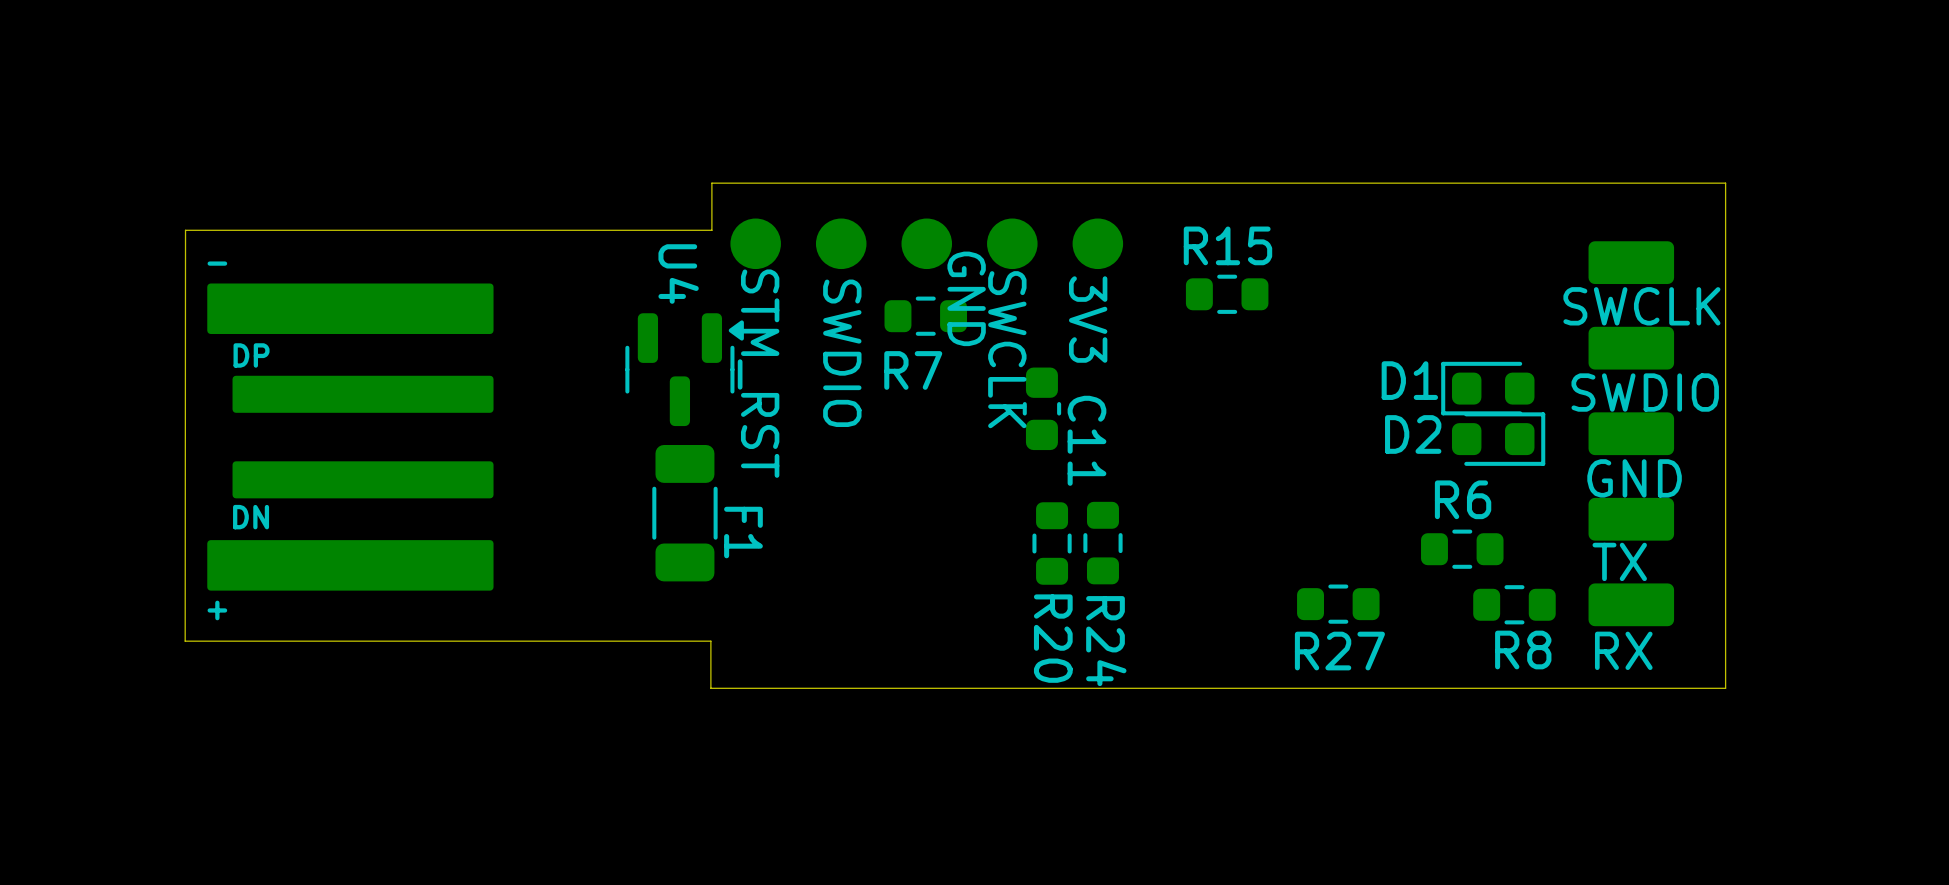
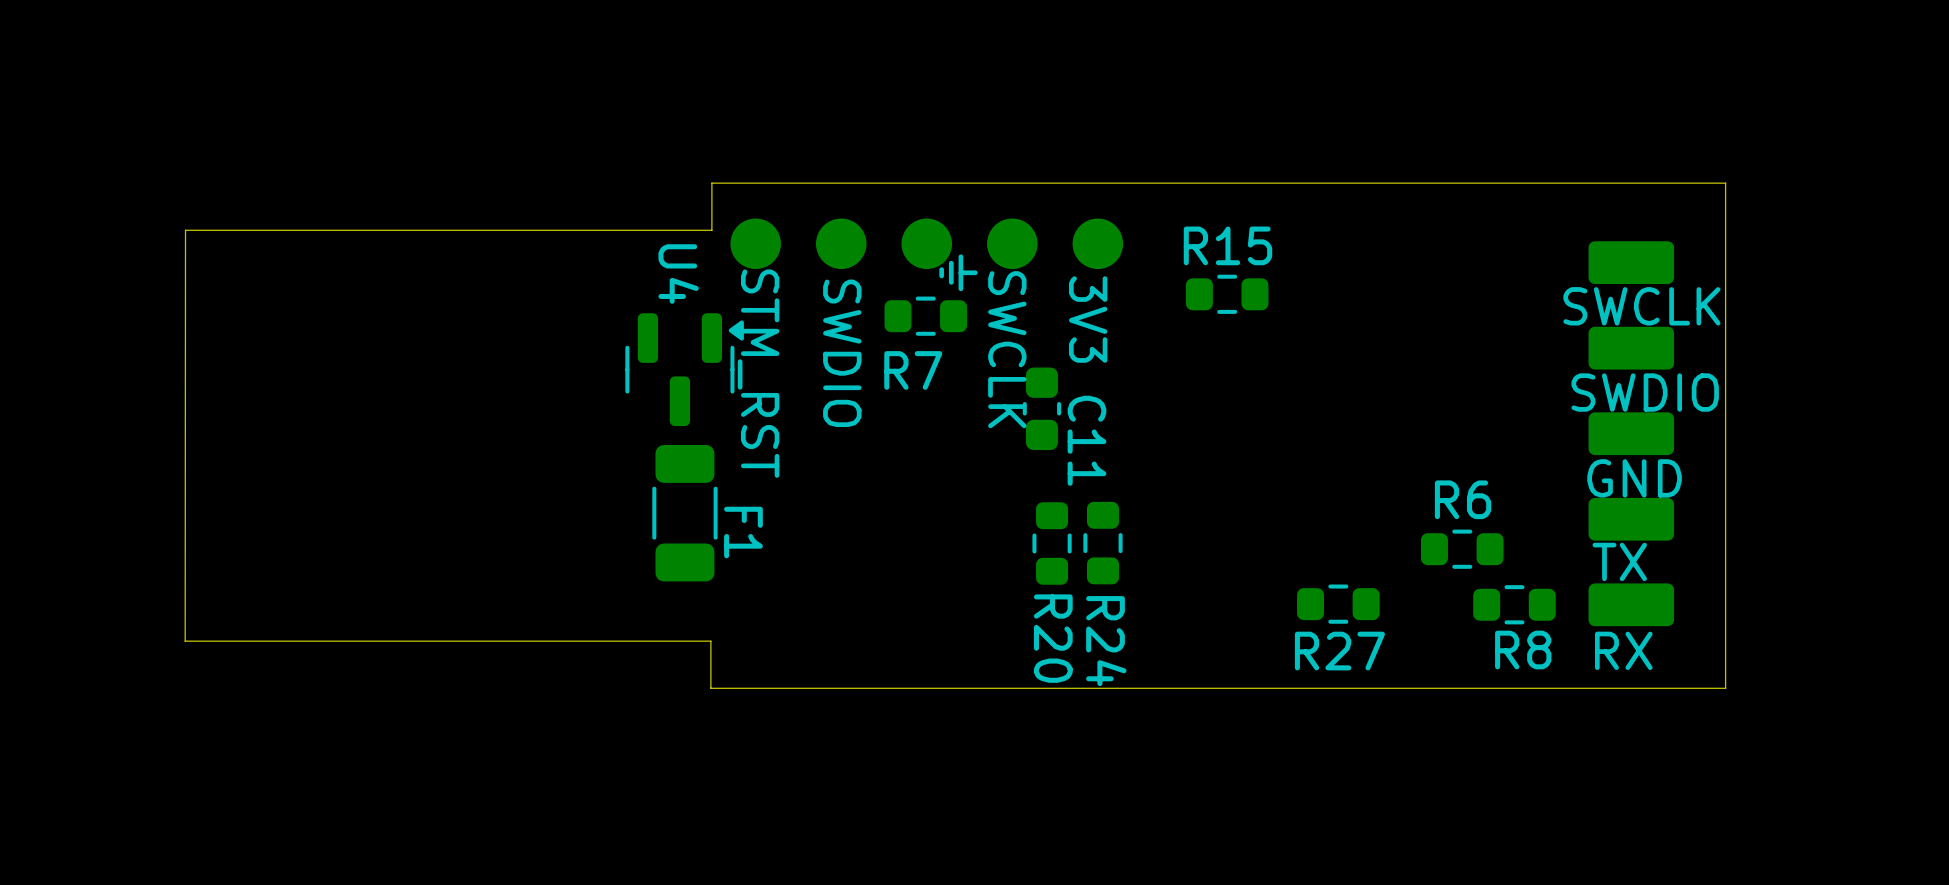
text: GND (966, 298) -> ⏚ (958, 272)
D1: (1487, 388) -> none
part: (350, 437) -> none
D2: (1498, 439) -> none

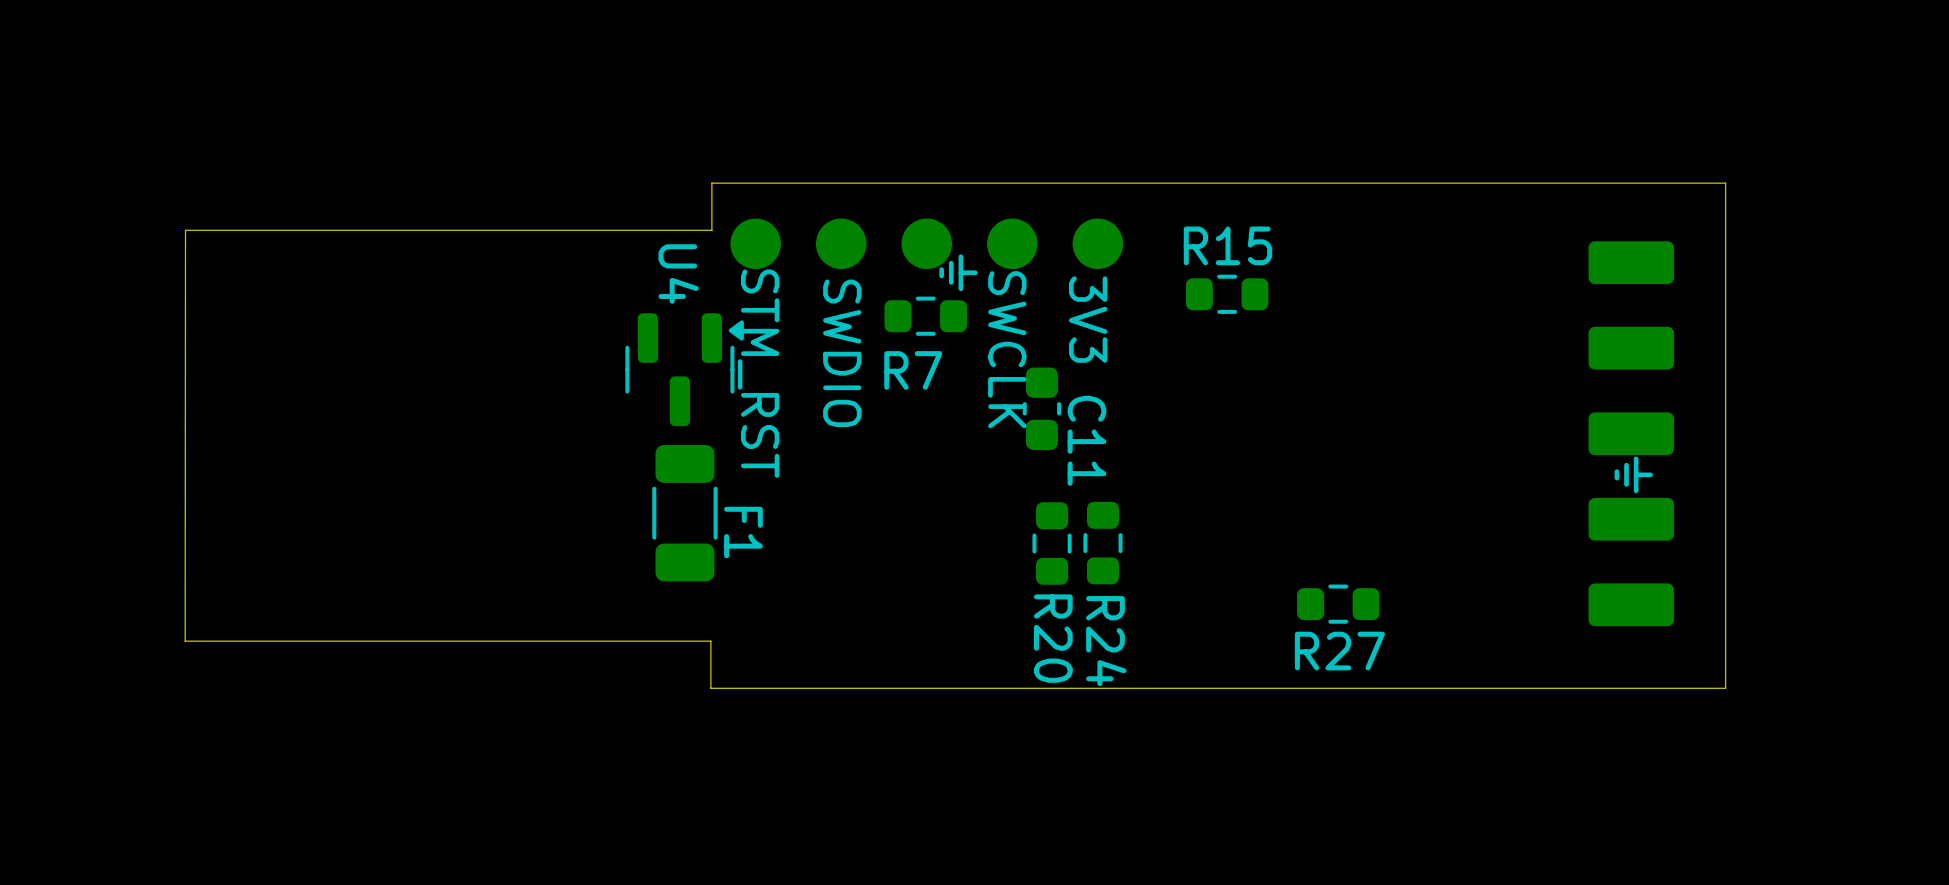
text: SWCLK (1641, 306) -> none
text: SWDIO (1645, 392) -> none
text: none -> ⏚ (1633, 474)
text: GND (1634, 478) -> none
R6: (1462, 549) -> none
text: TX (1619, 561) -> none
R8: (1514, 604) -> none
text: RX (1623, 650) -> none

